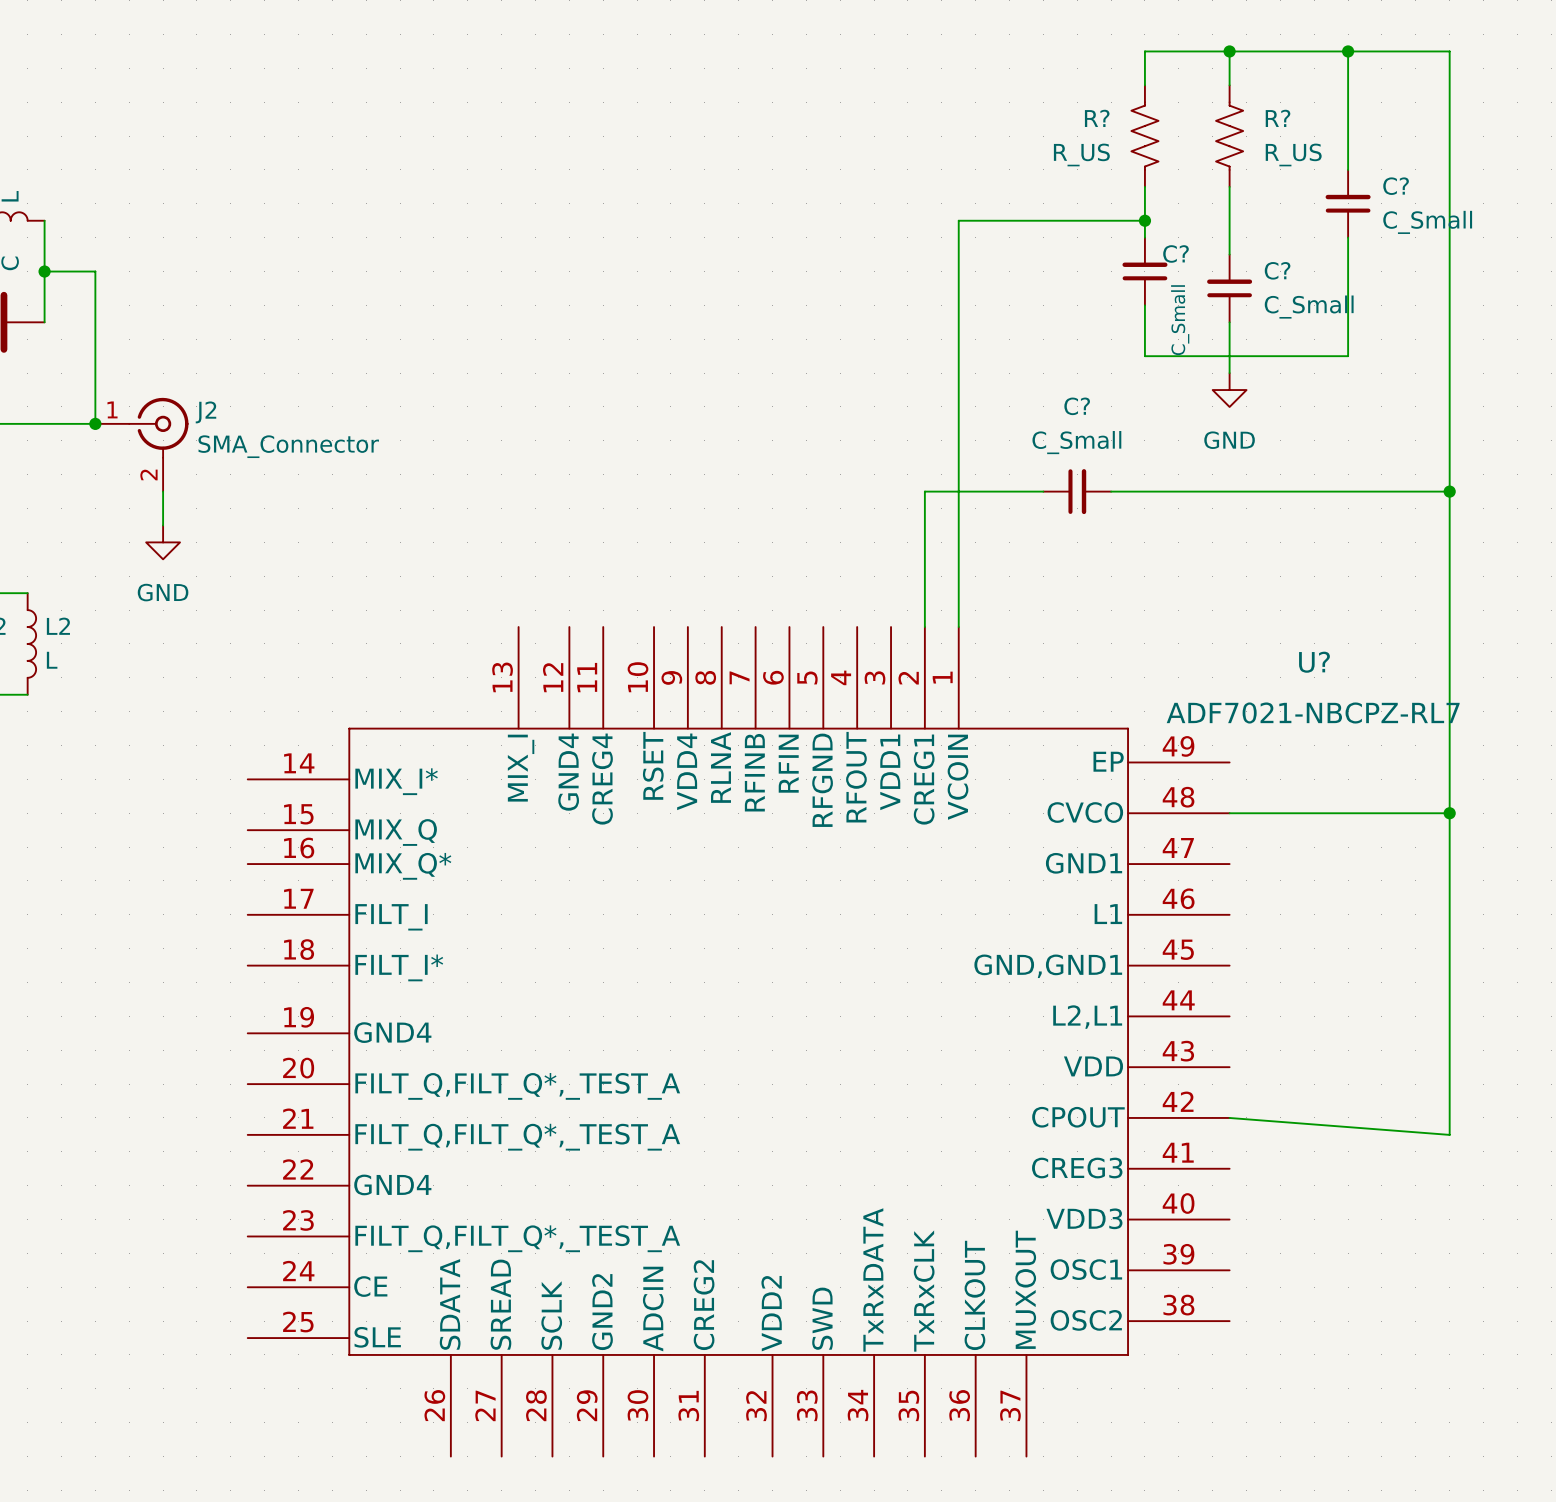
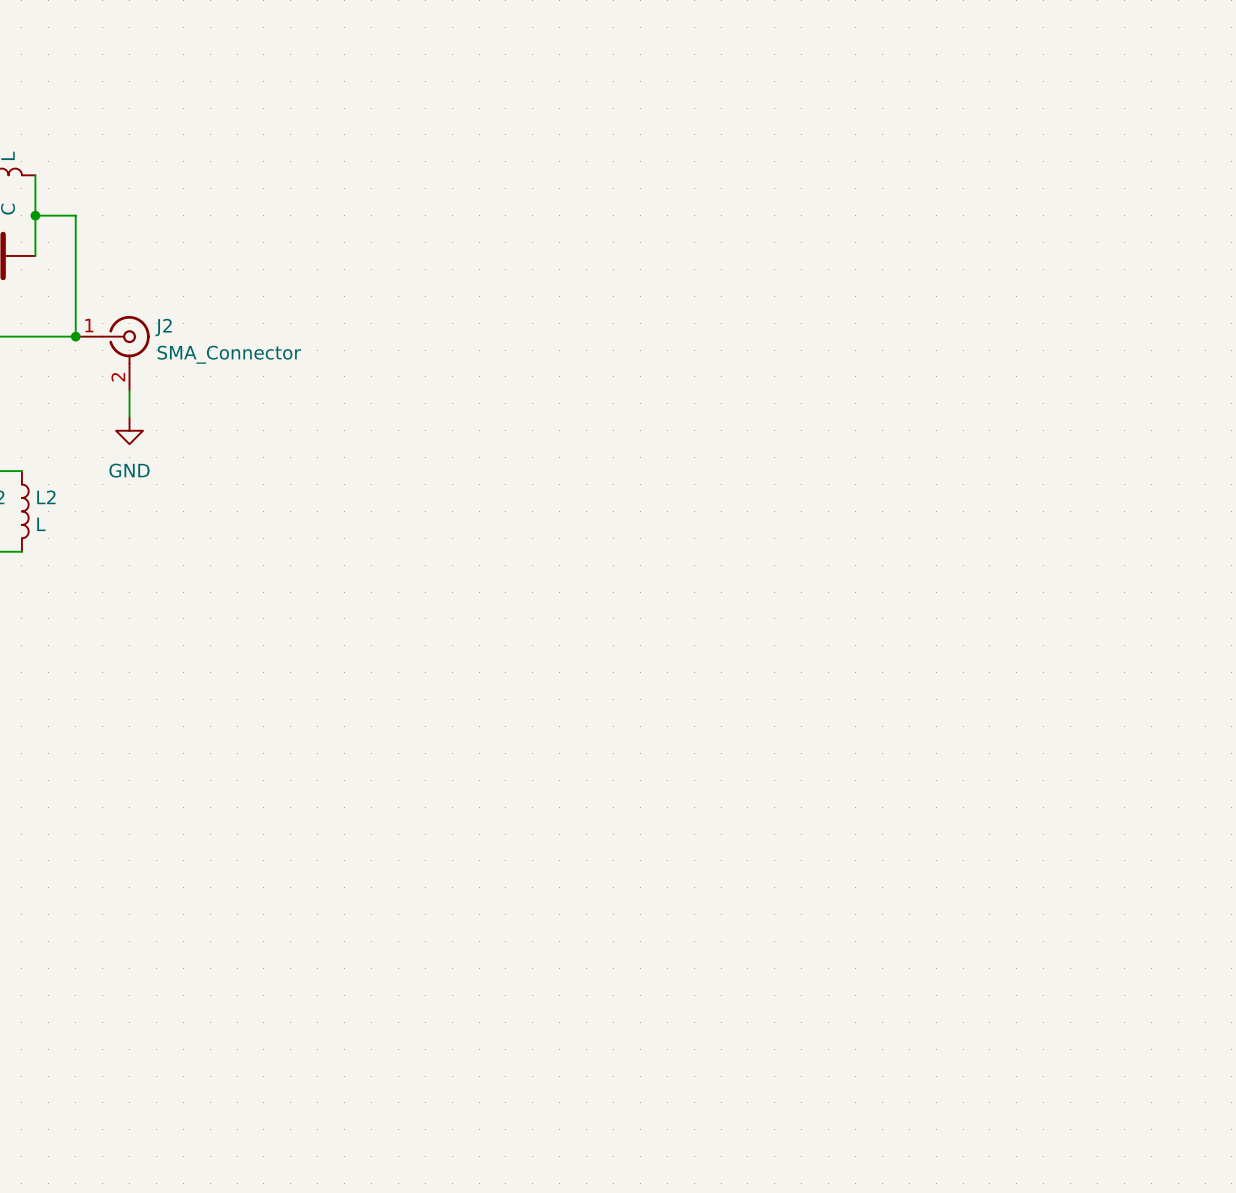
wire: (1229, 51) (1229, 85) -> none
junction: (1229, 51) -> none
wire: (1348, 51) (1348, 169) -> none
junction: (1348, 51) -> none
wire: (1144, 85) (1144, 51) (1449, 51) (1449, 1134) (1229, 1117) -> none
R?: R_US (1144, 136) -> none
R?: R_US (1229, 136) -> none
wire: (1144, 186) (1144, 237) -> none
wire: (1229, 186) (1229, 254) -> none
C?: C_Small (1348, 203) -> none
wire: (1144, 220) (958, 220) (958, 627) -> none
junction: (1144, 220) -> none
wire: (1348, 237) (1348, 356) (1144, 356) (1144, 305) -> none
C?: C_Small (1144, 271) -> none
C?: C_Small (1229, 288) -> none
wire: (1229, 322) (1229, 373) -> none
power symbol: GND (1229, 390) -> none
wire: (1043, 491) (924, 491) (924, 627) -> none
C?: C_Small (1077, 491) -> none
wire: (1111, 491) (1449, 491) -> none
junction: (1449, 491) -> none
wire: (1229, 813) (1449, 813) -> none
junction: (1449, 813) -> none
U?: ADF7021-NBCPZ-RL7 (738, 1041) -> none

